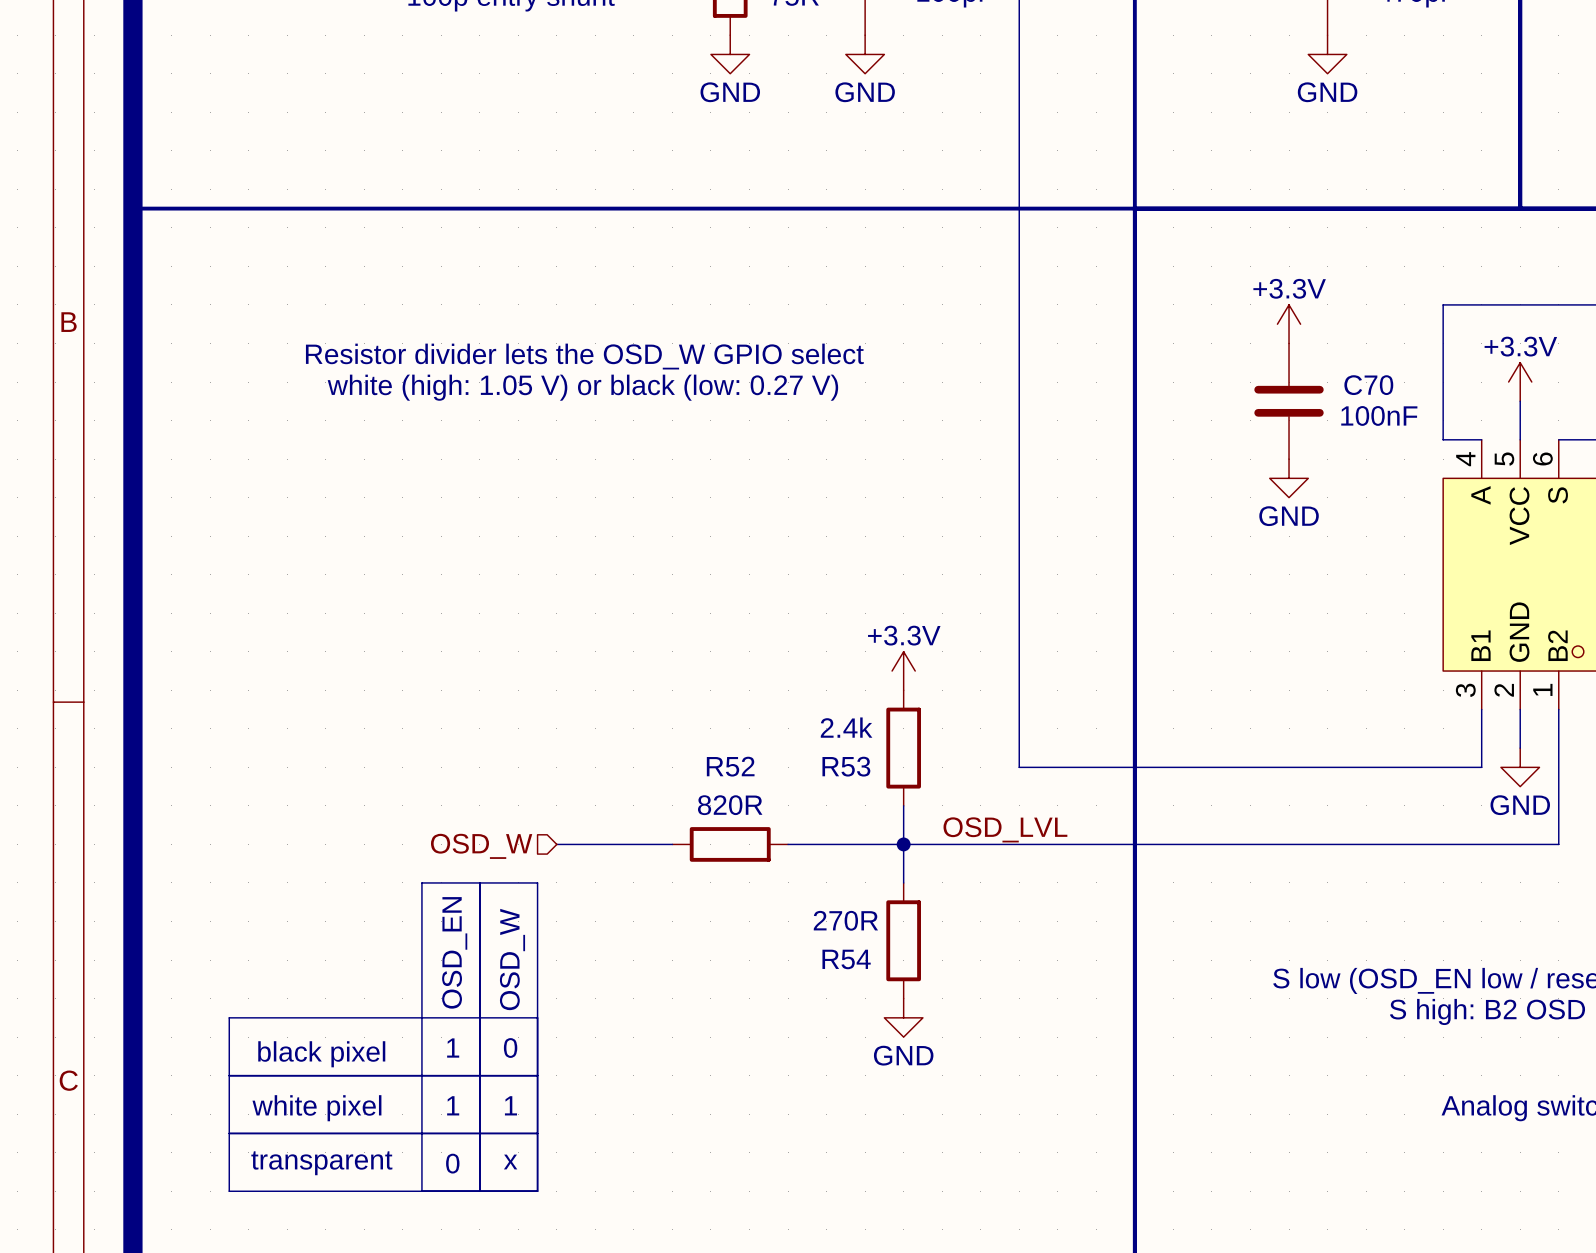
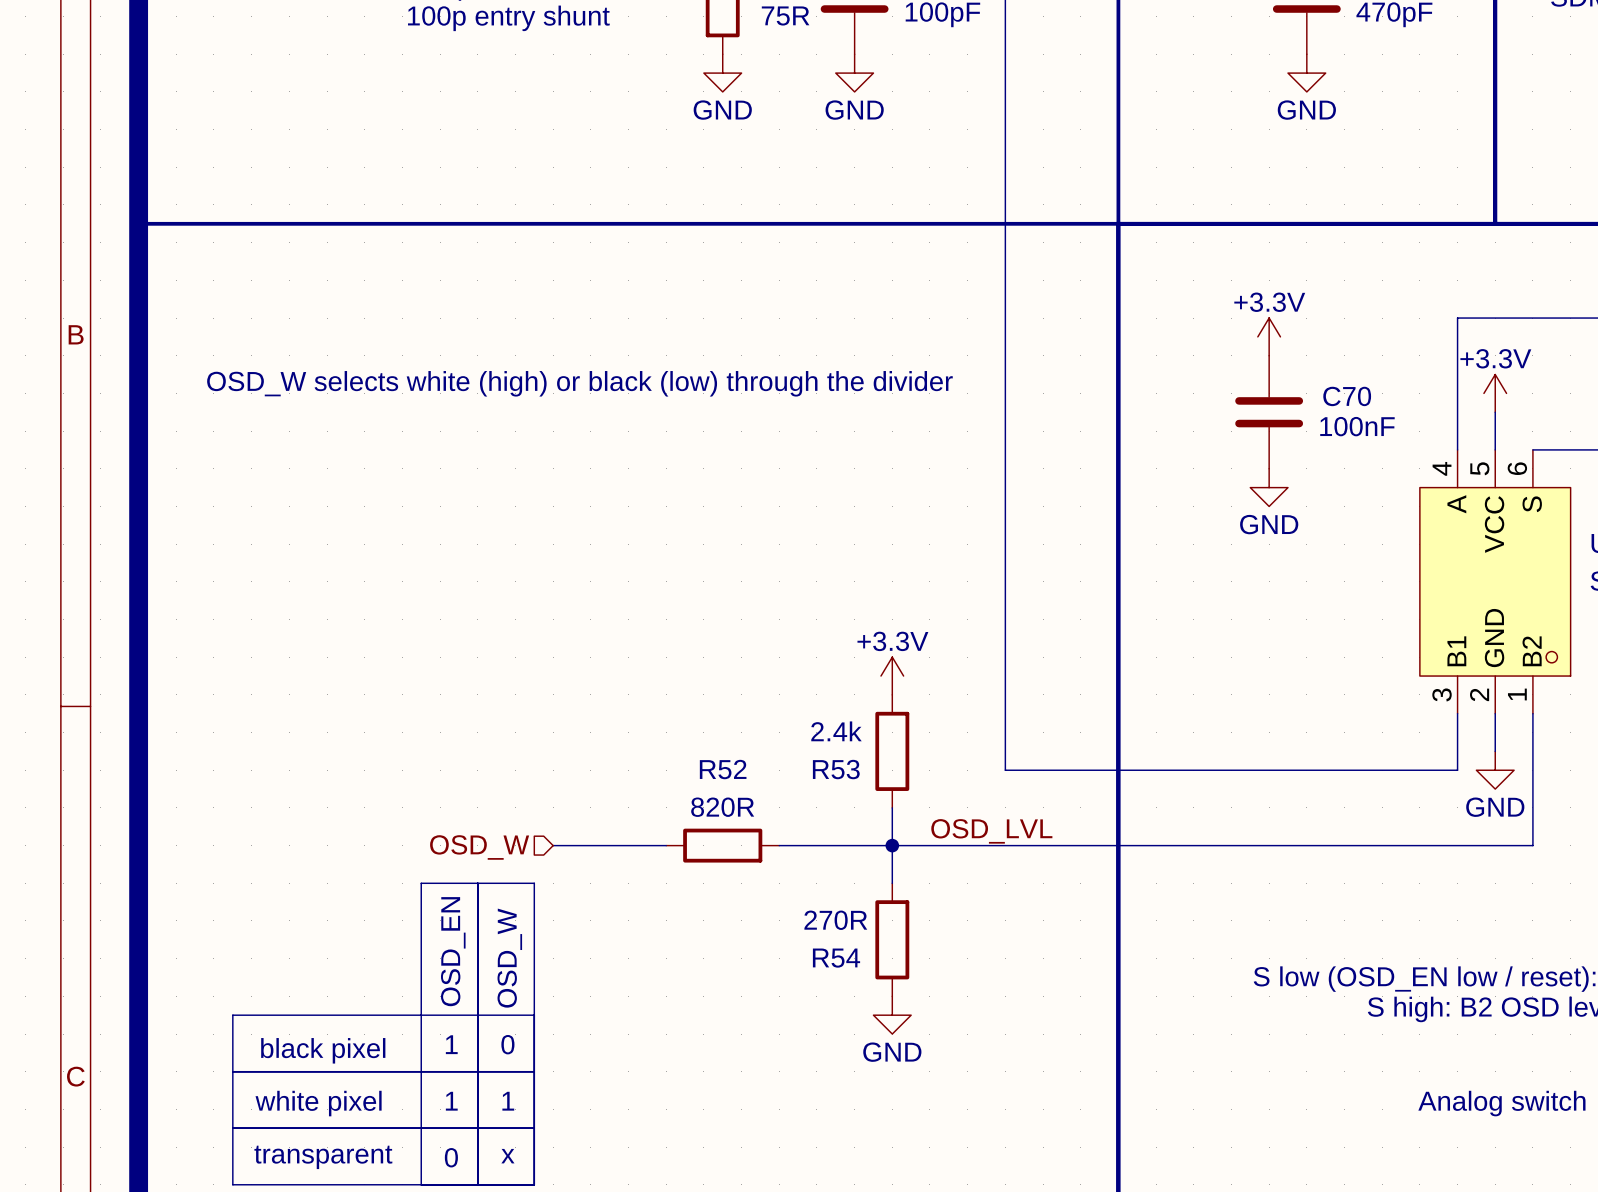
wire: (1481, 304) (1443, 304) (1443, 439) (1481, 439) -> (1457, 318) (1457, 449)
text: Resistor divider lets the OSD_W GPIO select (584, 356) -> none
text: none -> OSD_W selects white (high) or black (low) through the divider (579, 383)
text: white (high: 1.05 V) or black (low: 0.27 V) (582, 387) -> none

